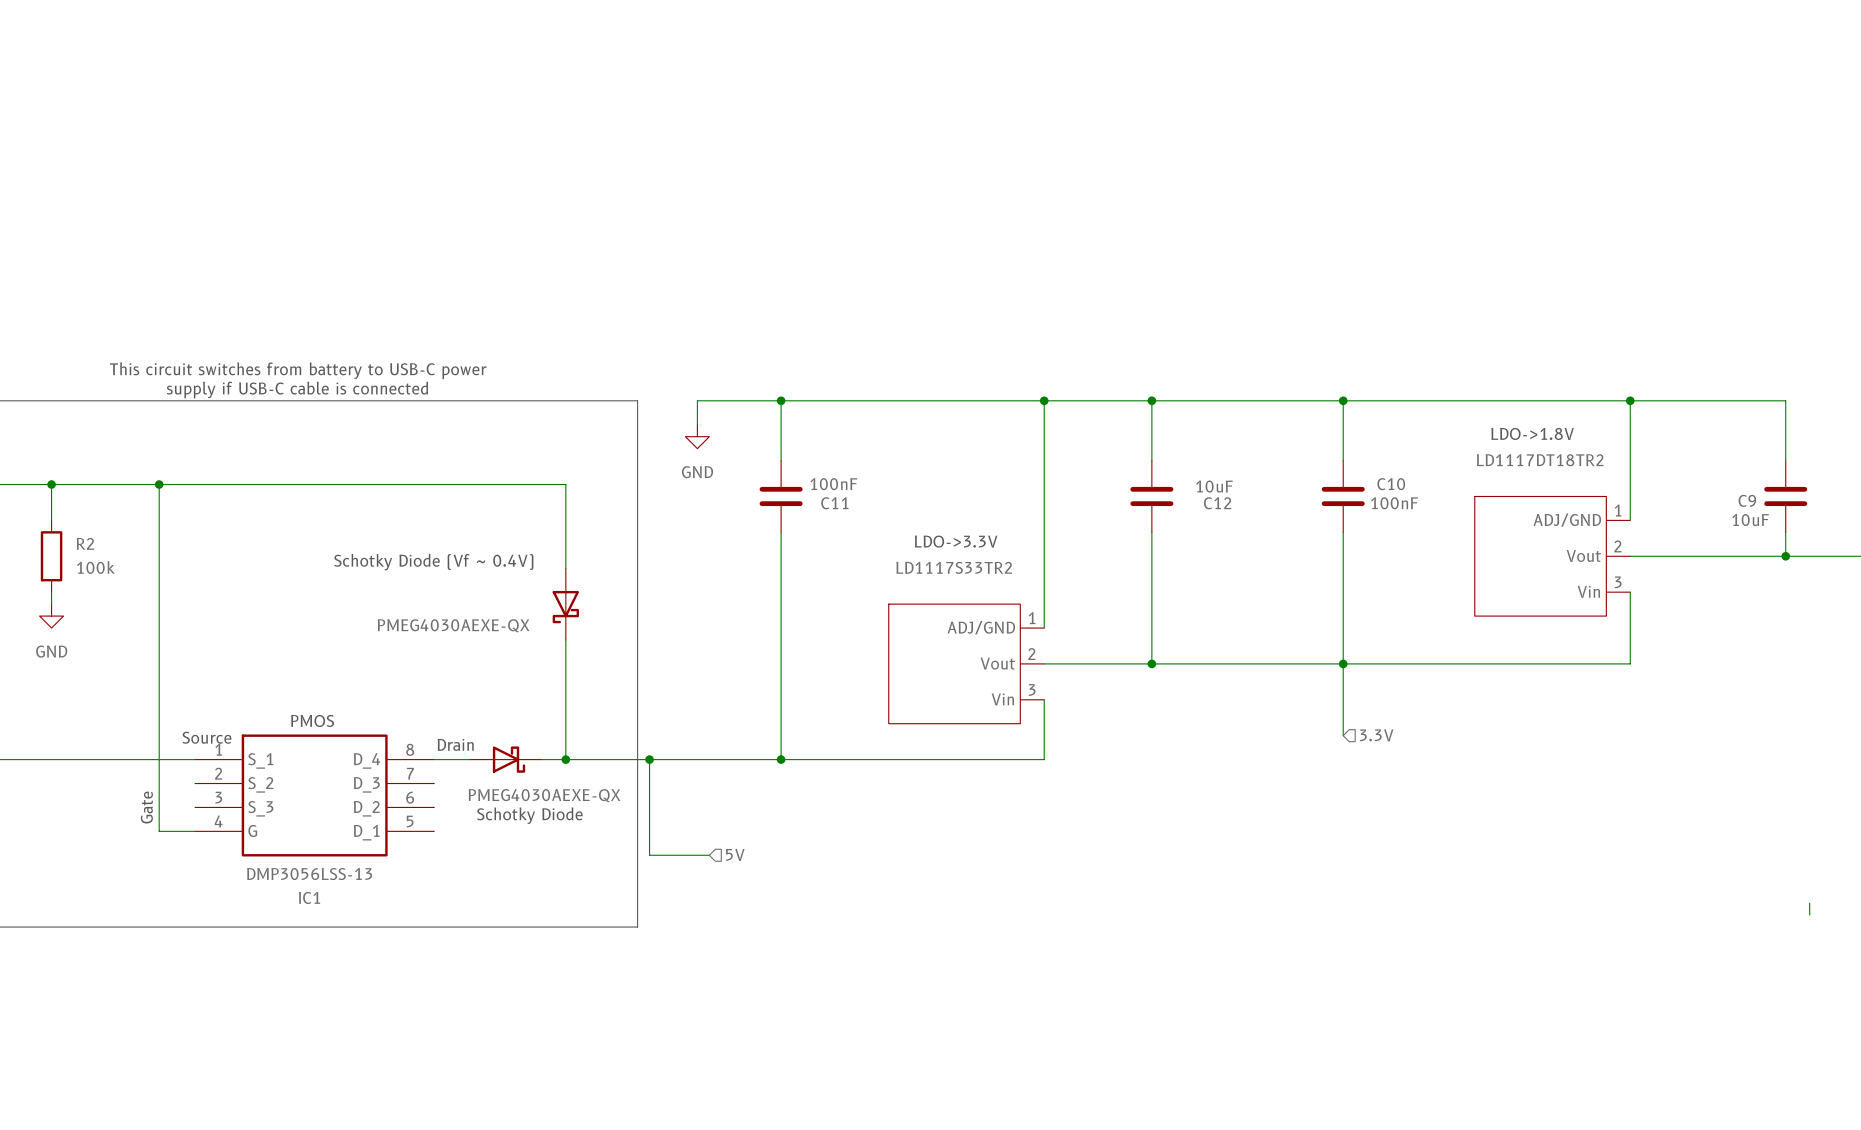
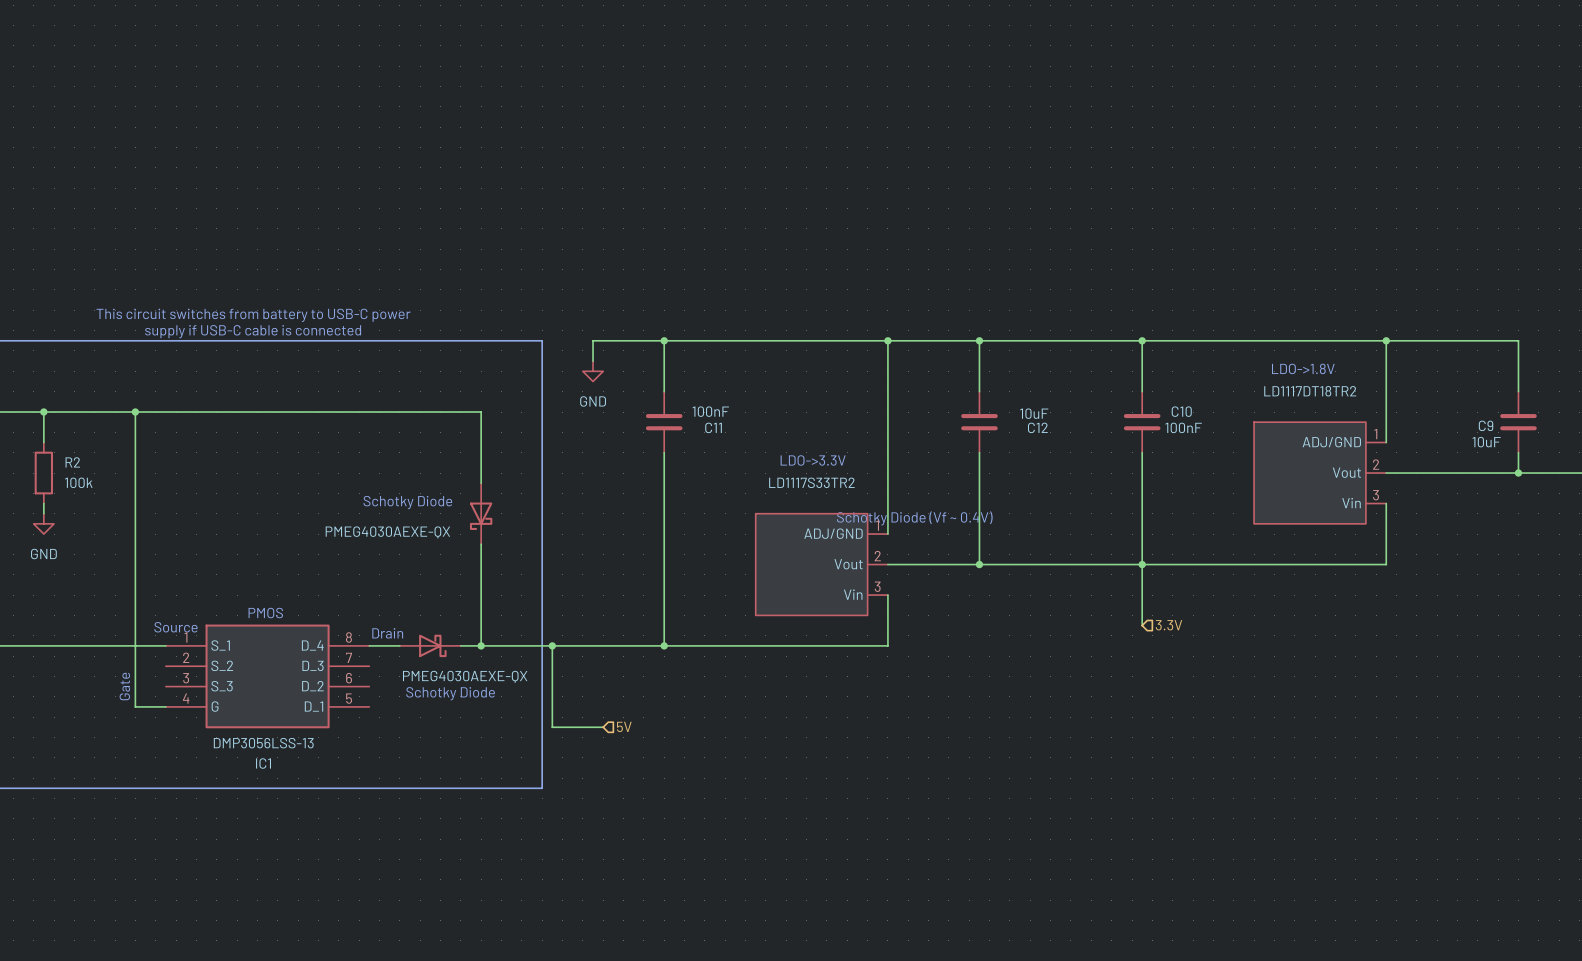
text: Schotky Diode (Vf ~ 0.4V) (433, 562) -> none
text: none -> Schotky Diode (407, 502)
text: none -> Schotky Diode (Vf ~ 0.4V) (914, 518)
wire: (1809, 903) (1809, 915) -> none

